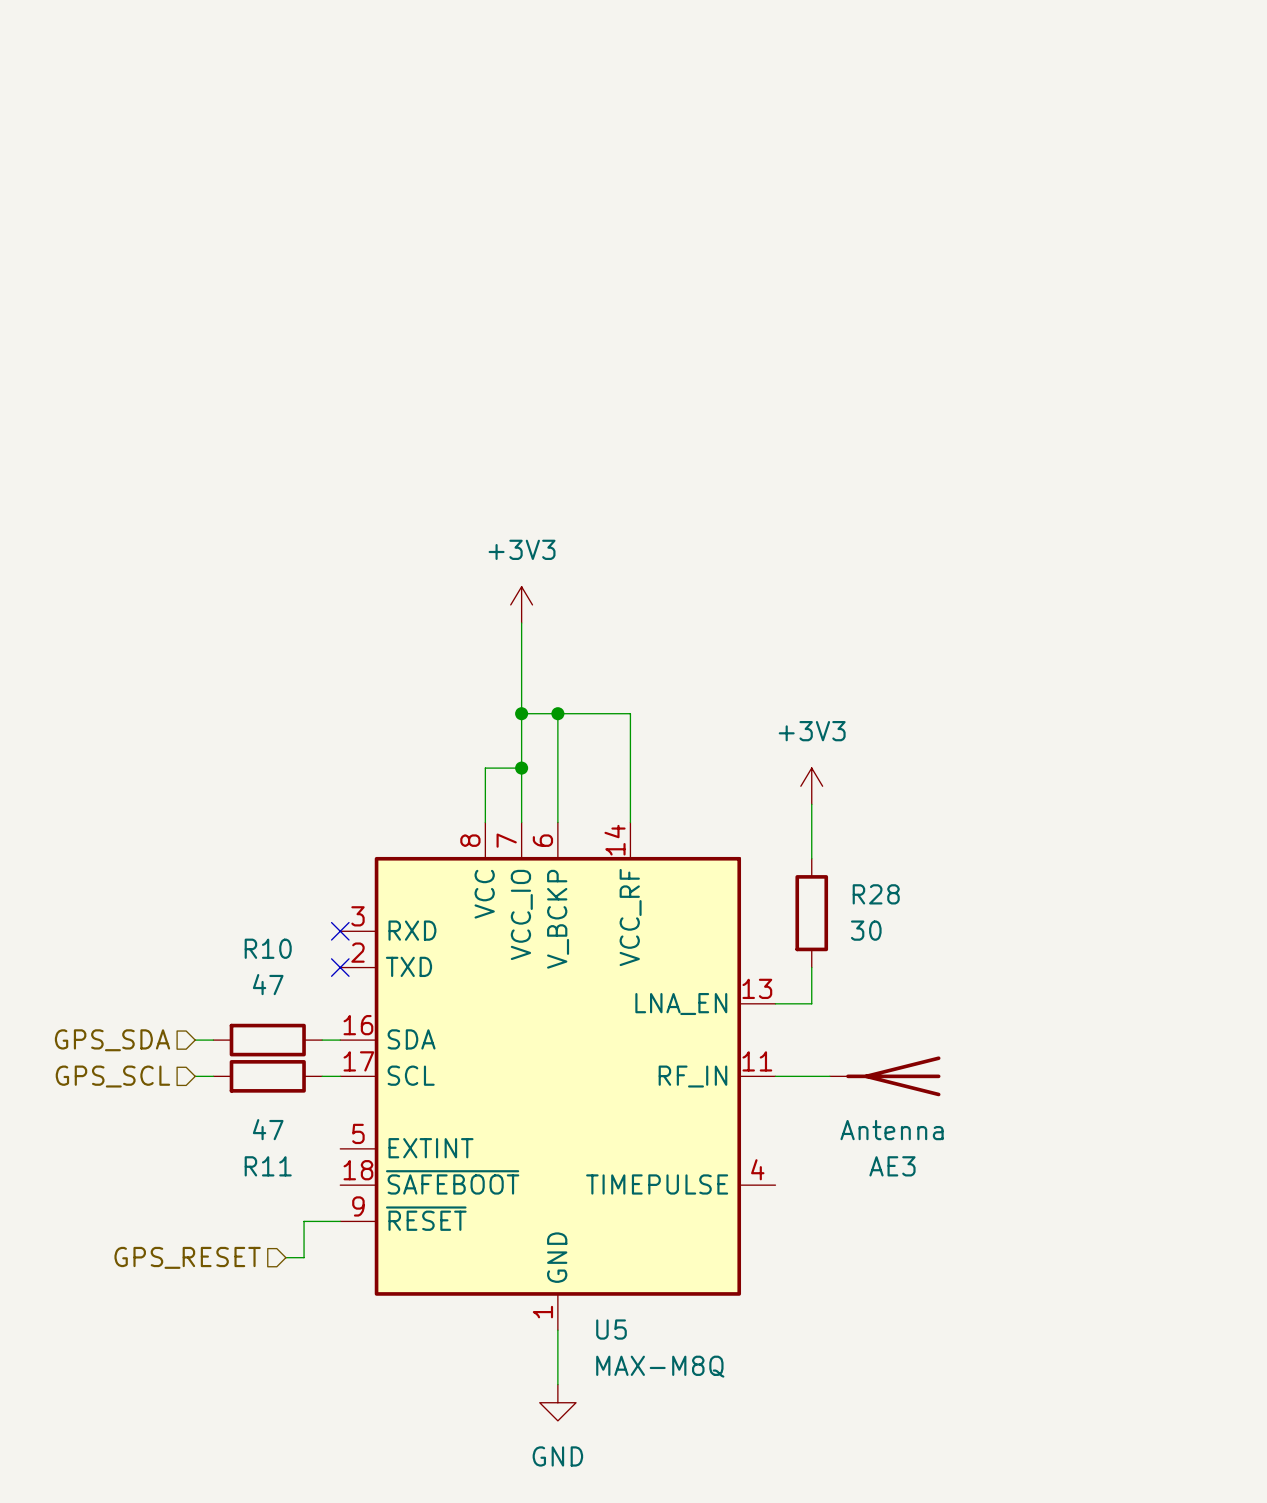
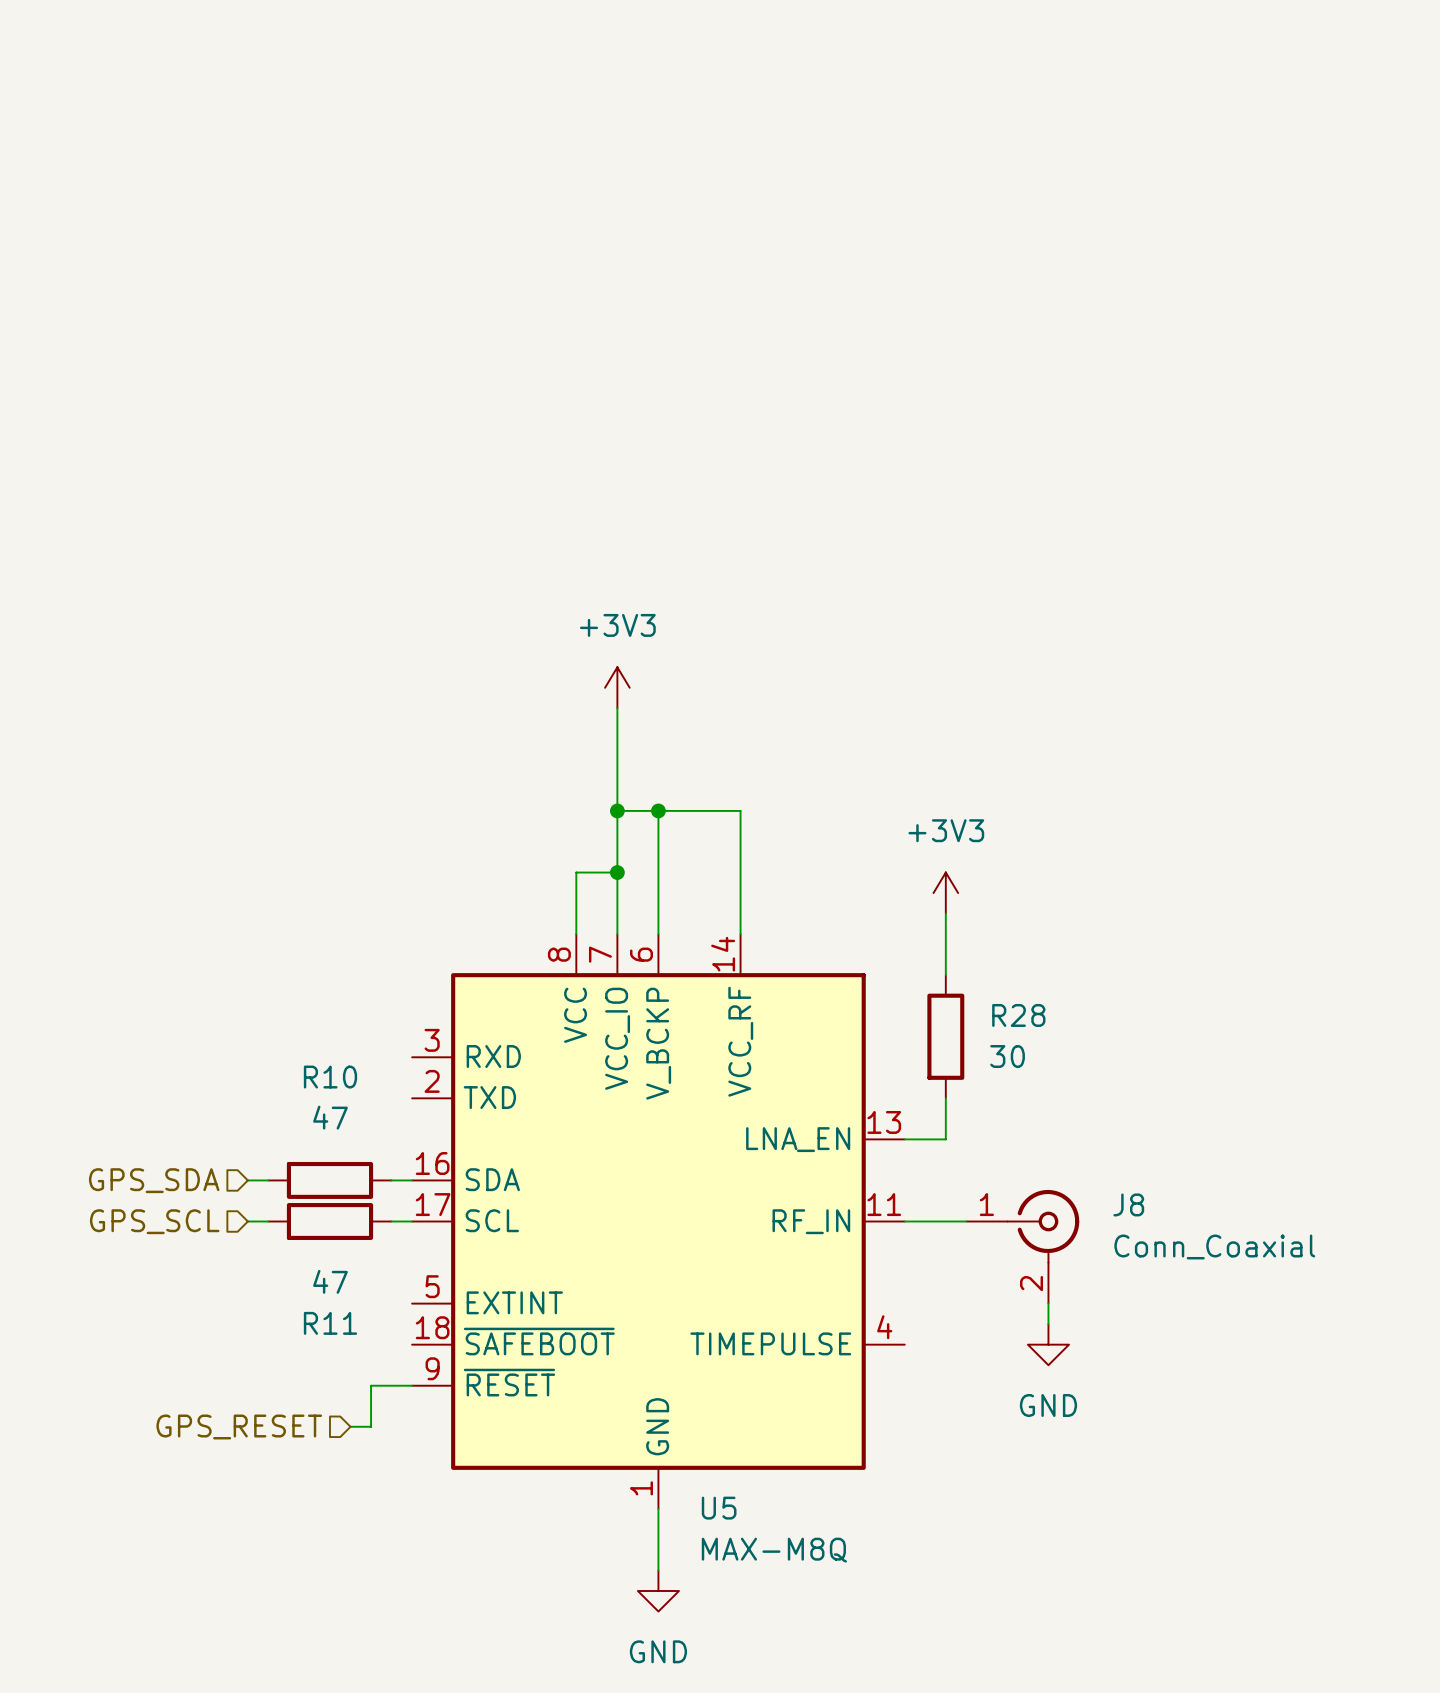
no-connect mark: (340, 931) -> none
no-connect mark: (340, 967) -> none
AE3: Antenna (885, 1076) -> none
J8: none -> Conn_Coaxial (1022, 1246)
wire: none -> (1048, 1303) (1048, 1324)
power symbol: none -> GND (1048, 1344)

